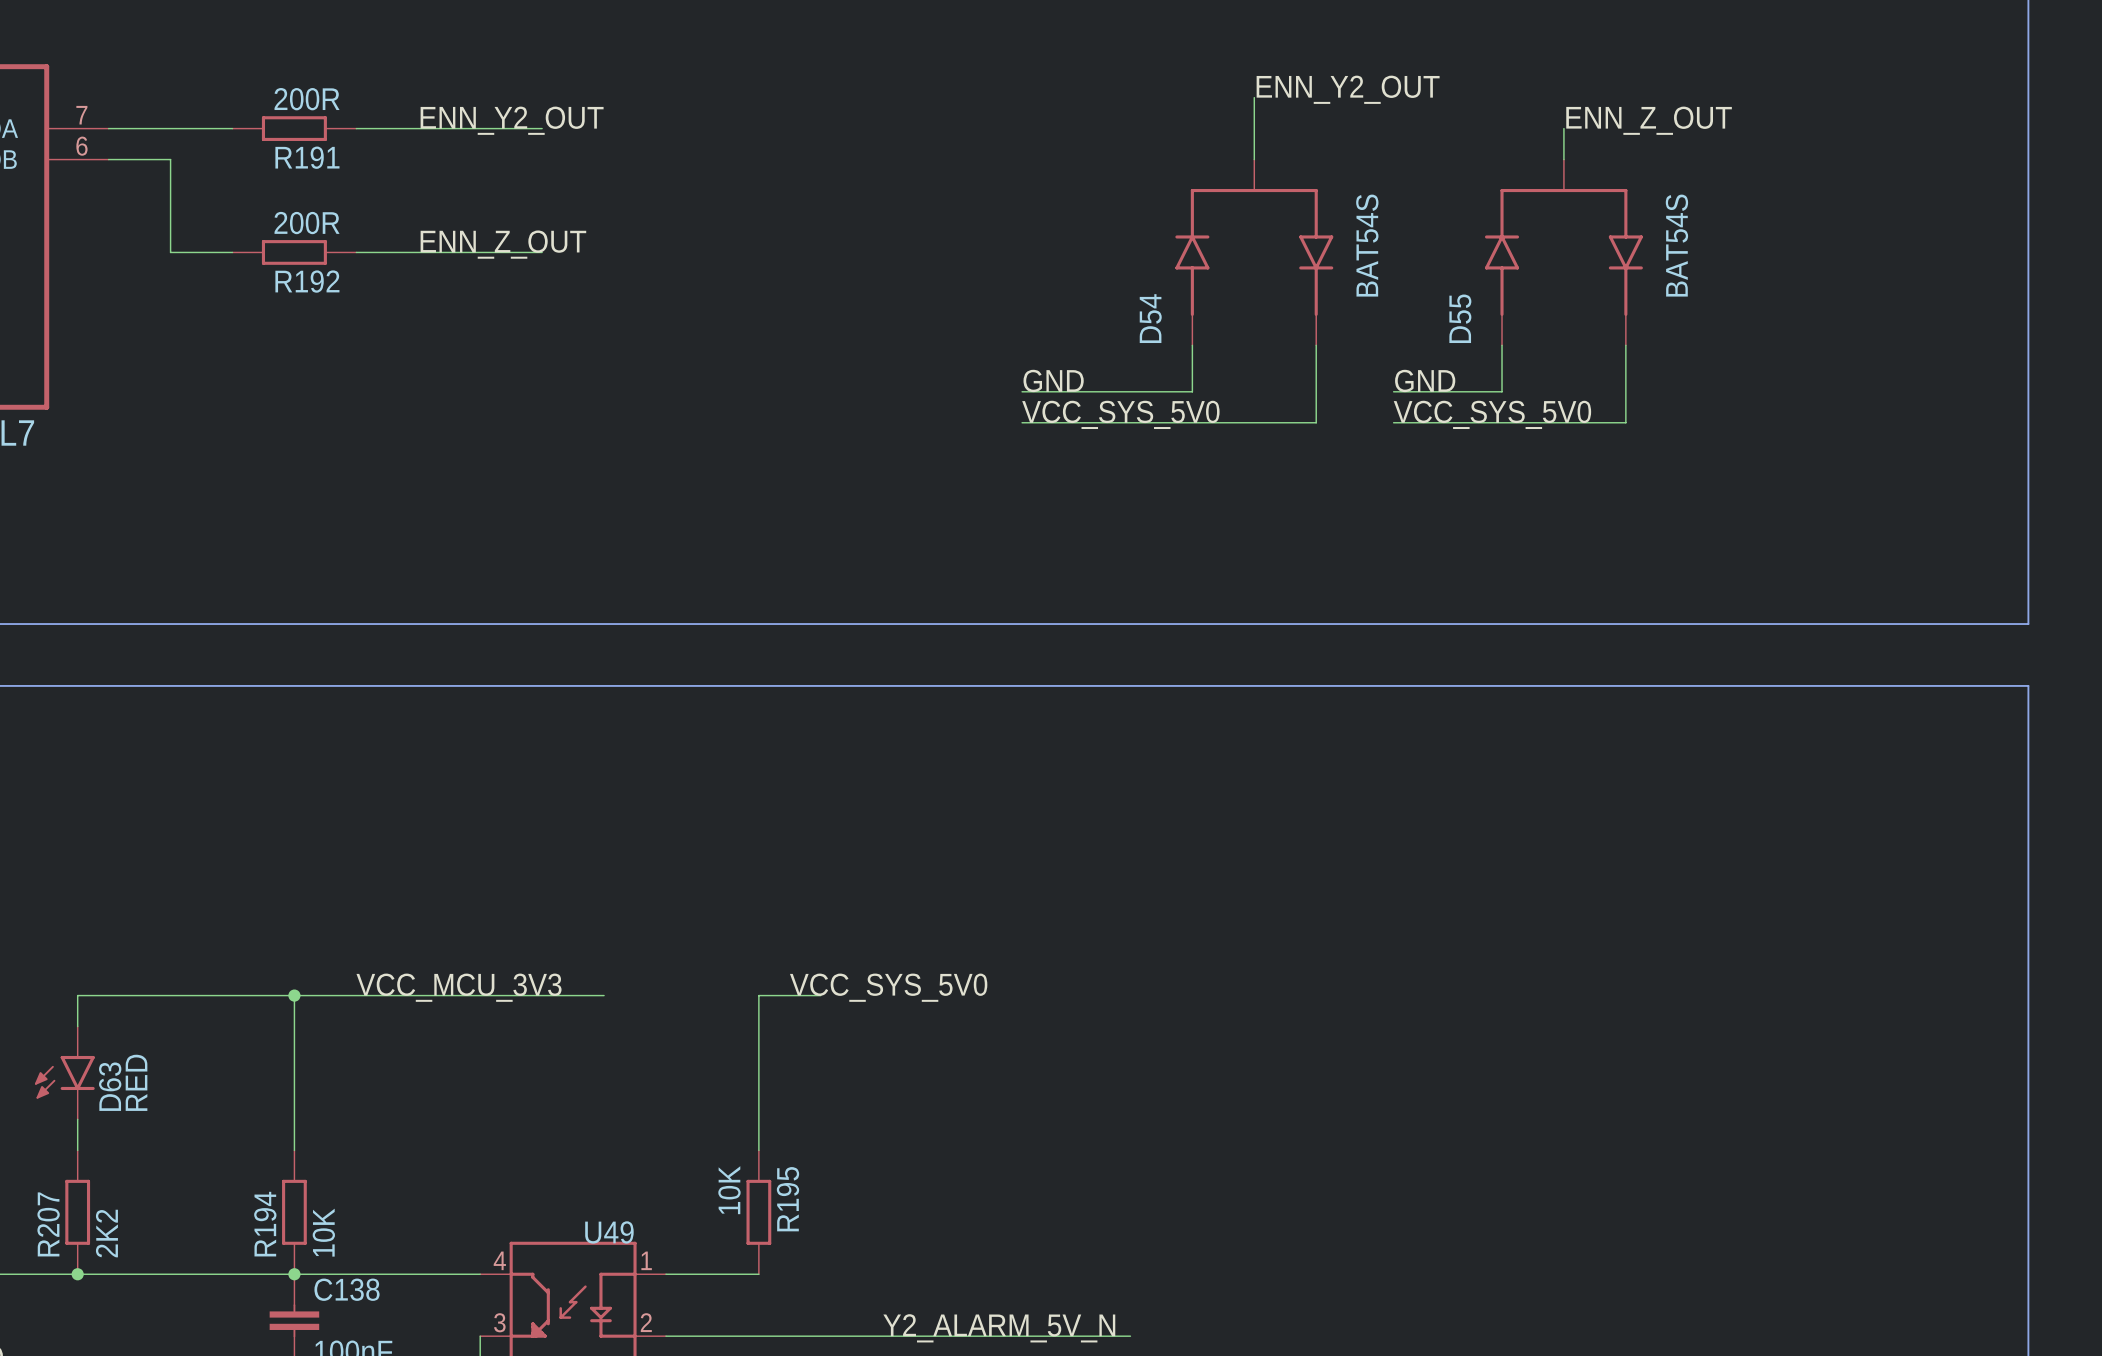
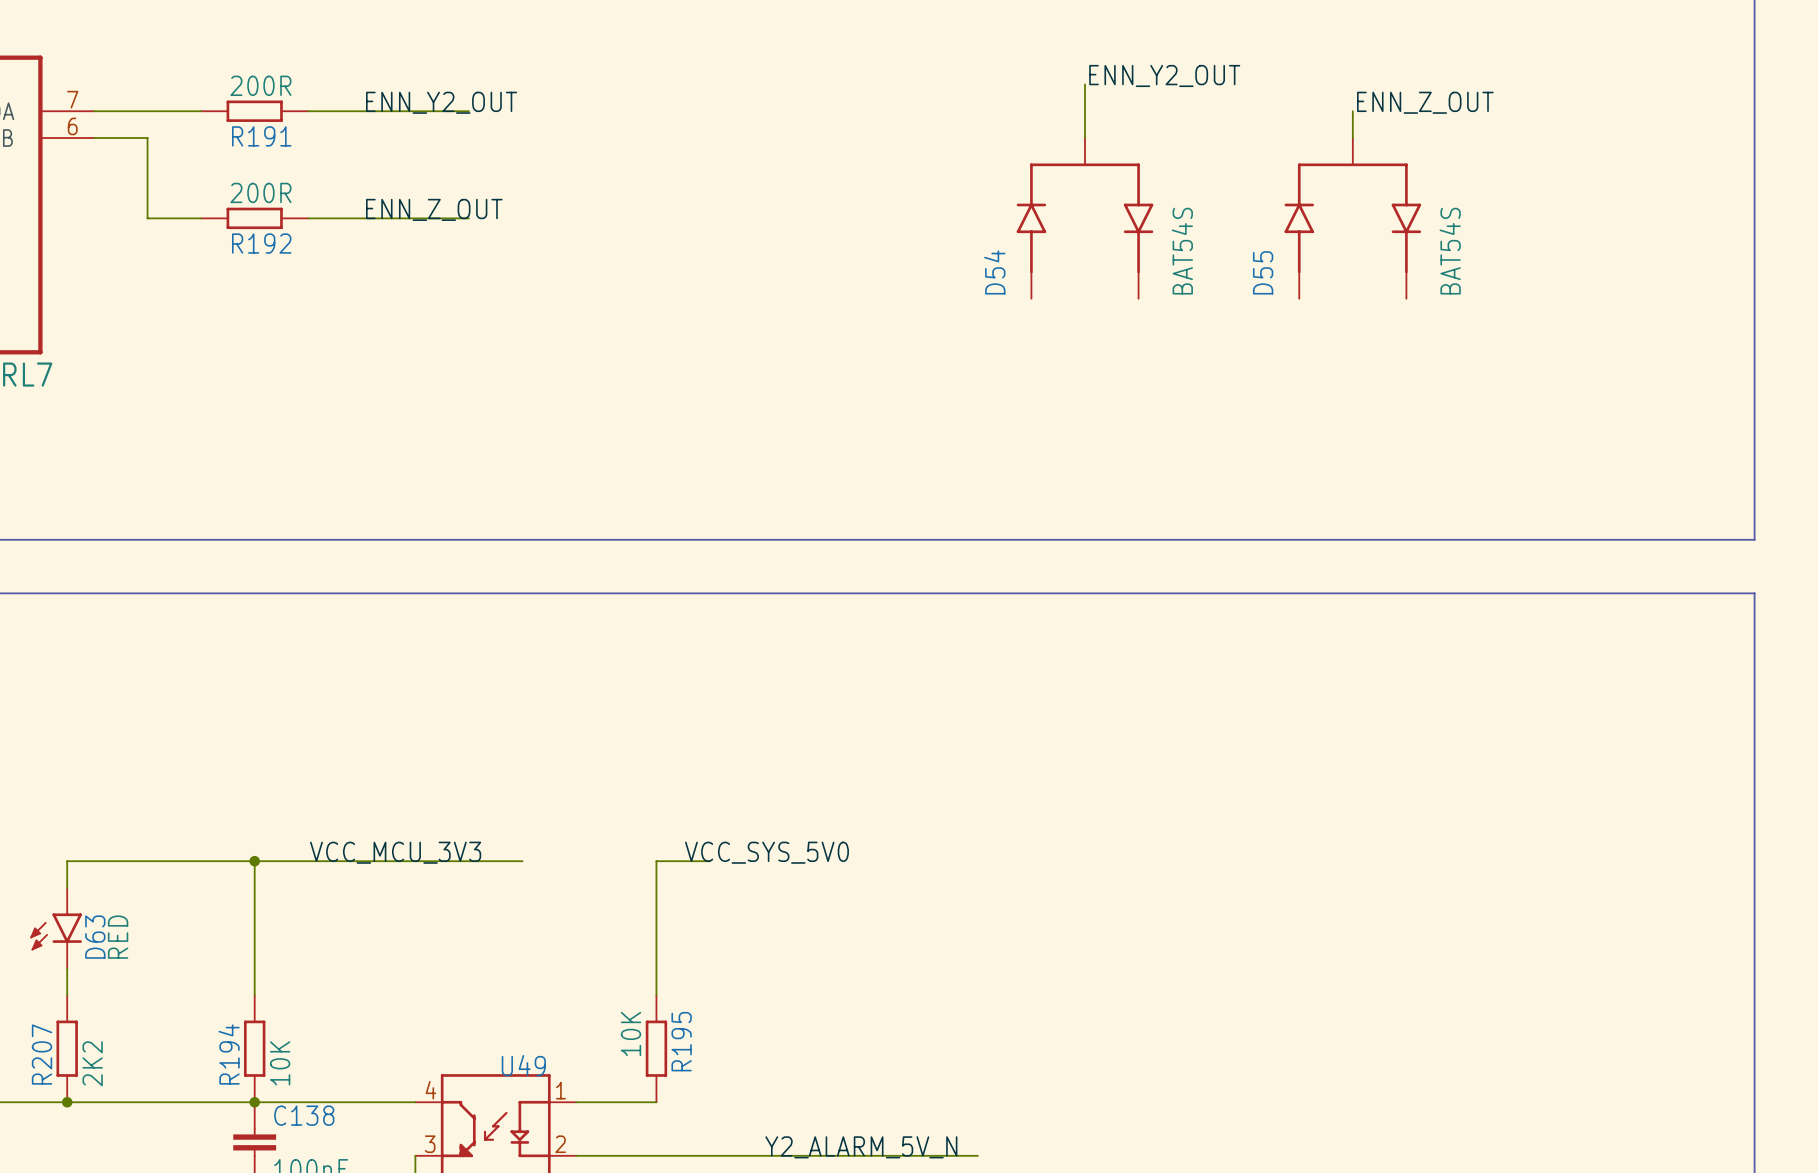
D54 value position: BAT54S (1367, 245) -> BAT54S (1182, 251)
D55 value position: BAT54S (1676, 245) -> BAT54S (1450, 251)
wire: (1192, 345) (1192, 391) (1022, 391) -> none
wire: (1316, 345) (1316, 422) (1022, 422) -> none
wire: (1502, 345) (1502, 391) (1393, 391) -> none
wire: (1625, 345) (1625, 422) (1393, 422) -> none
label: GND (1053, 380) -> none
label: GND (1425, 380) -> none
label: VCC_SYS_5V0 (1120, 414) -> none
label: VCC_SYS_5V0 (1492, 414) -> none

